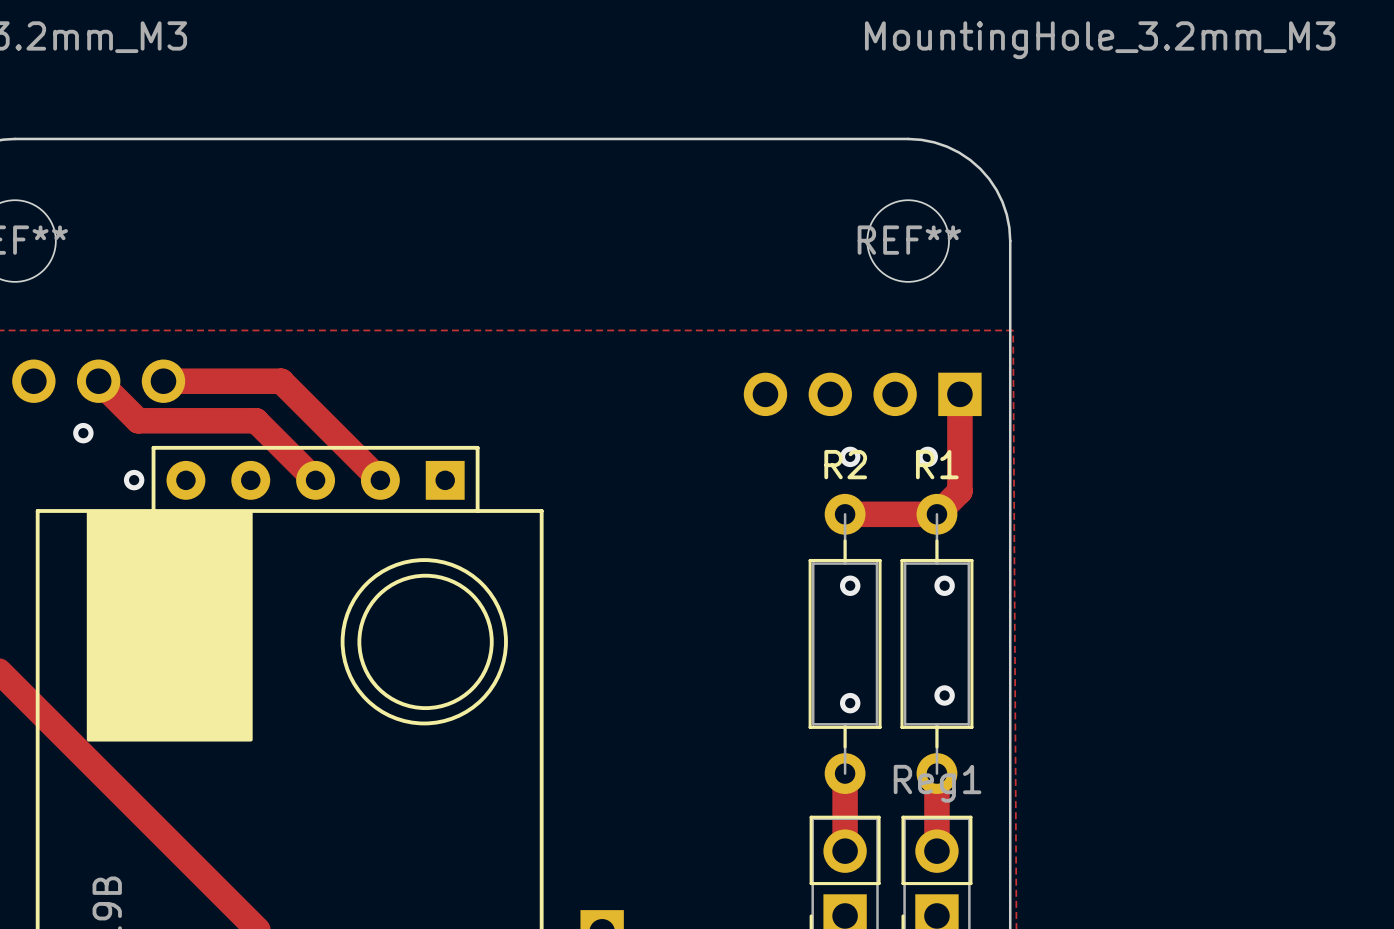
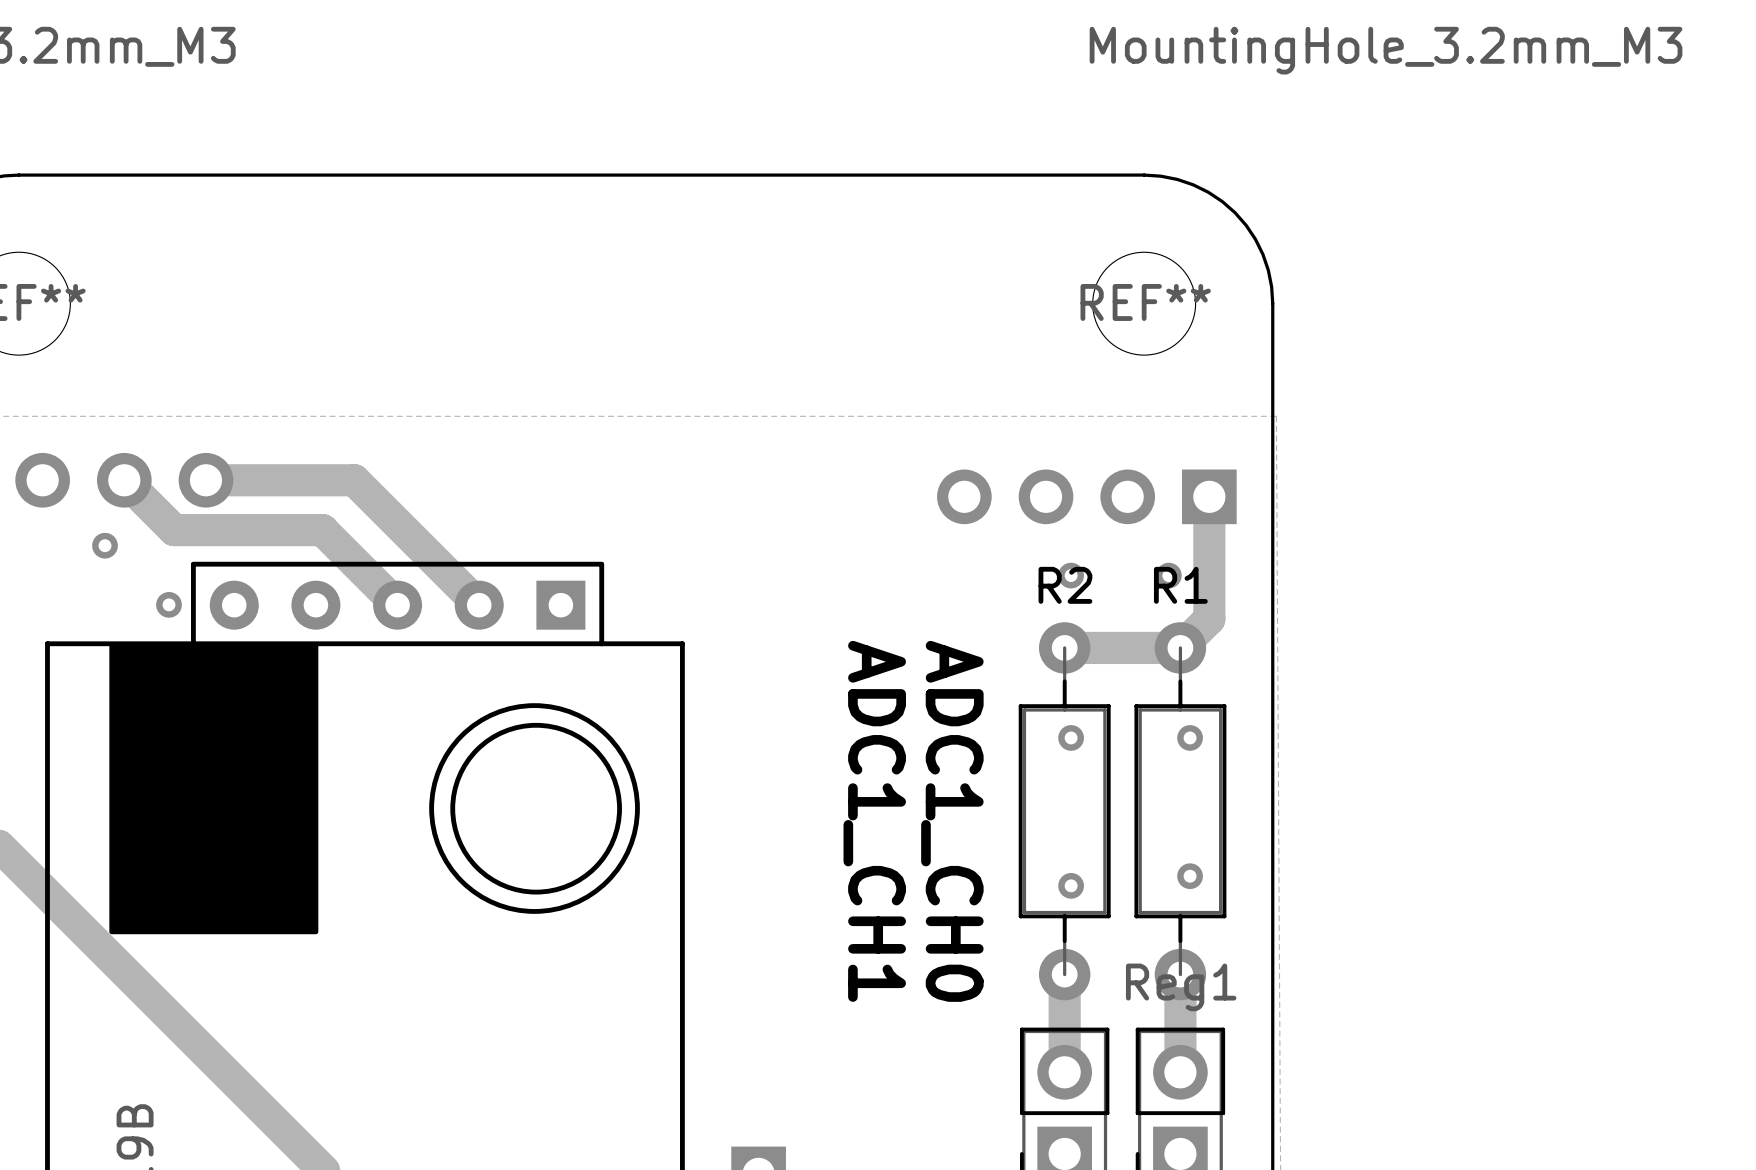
text: none -> ADC1_CH1 (874, 821)
text: none -> ADC1_CH0 (952, 821)

